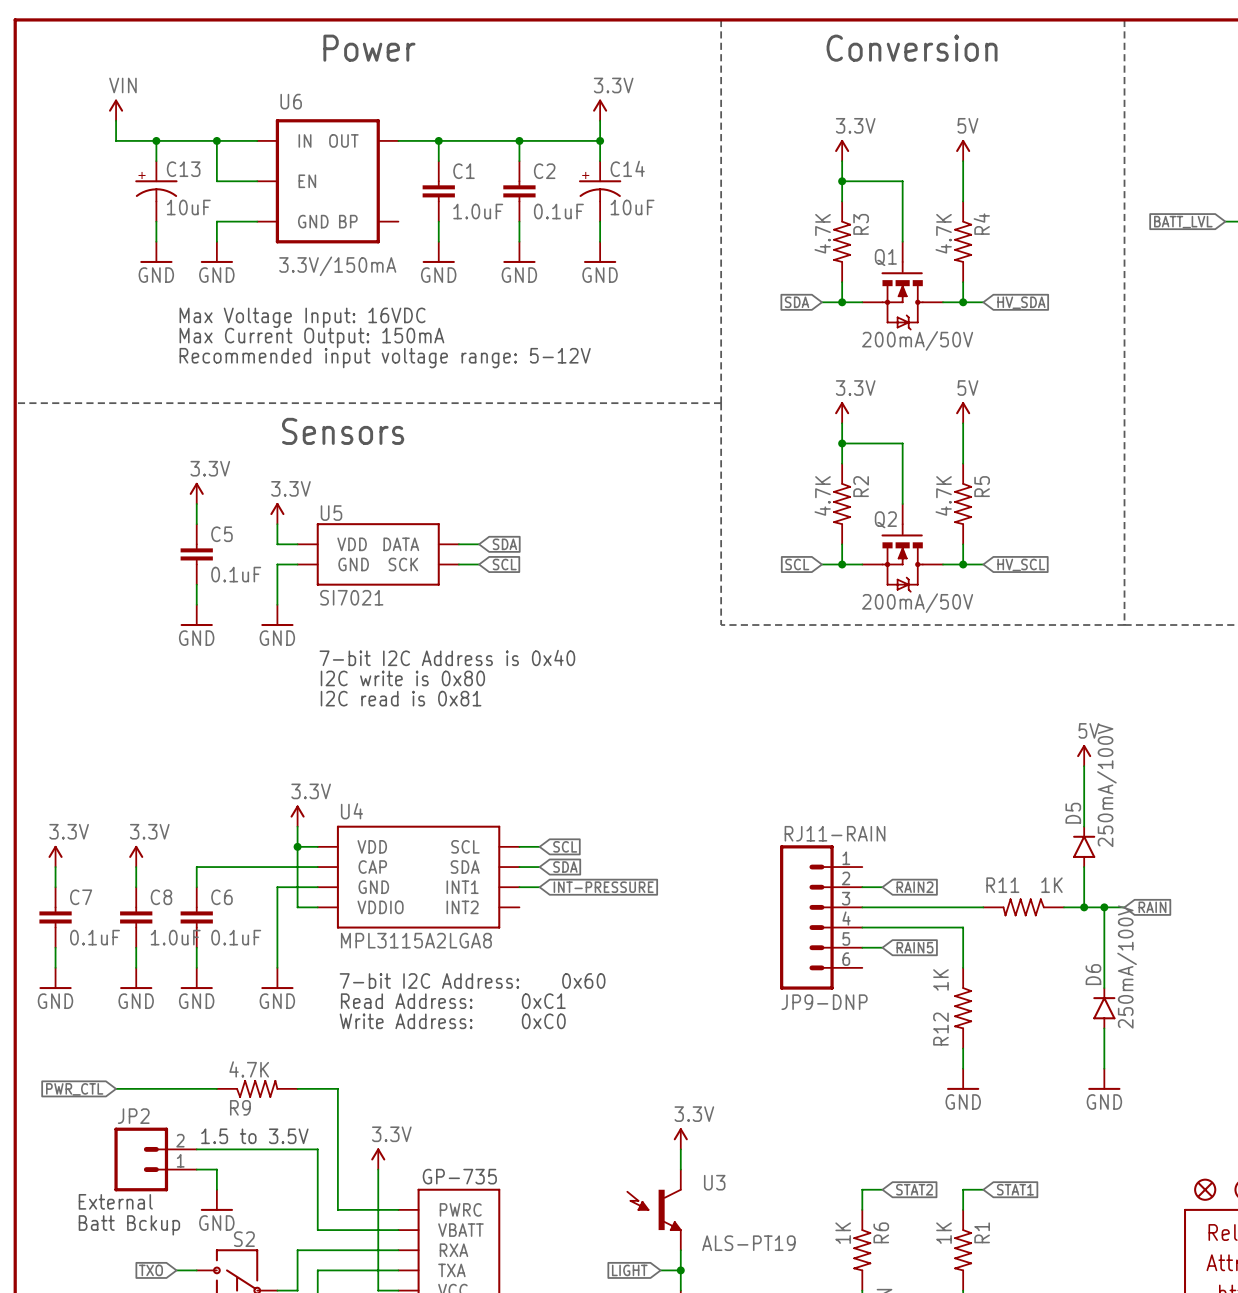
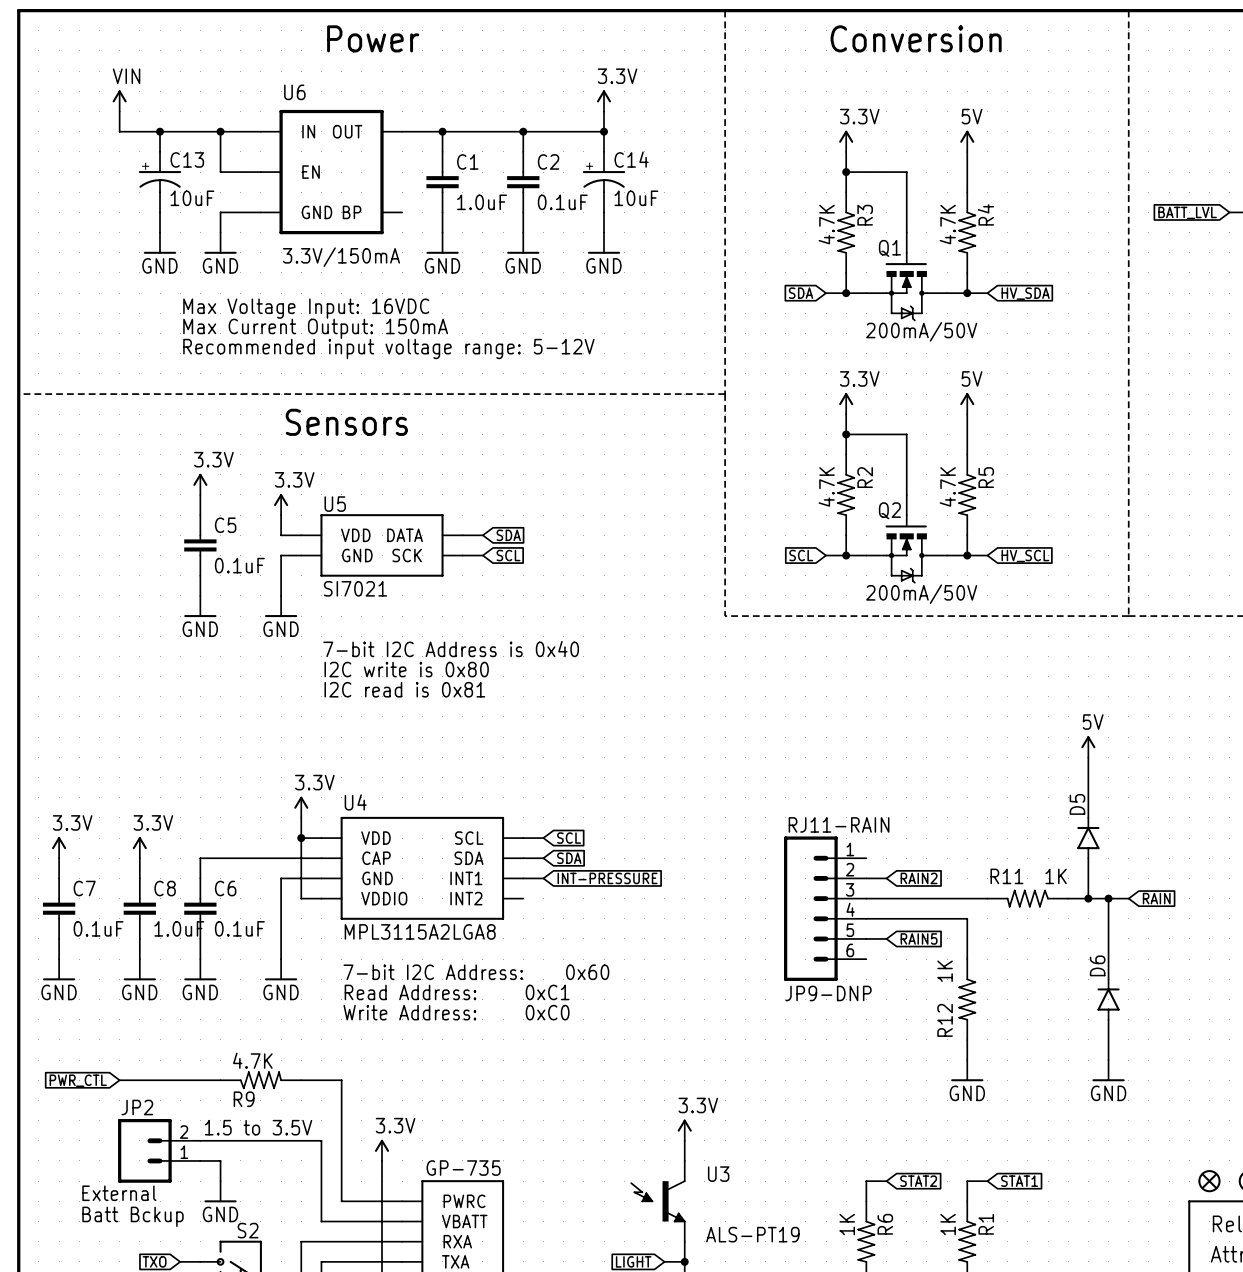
D5 value: 250mA/100V (1106, 785) -> none
D6 value: 250mA/100V (1127, 967) -> none

